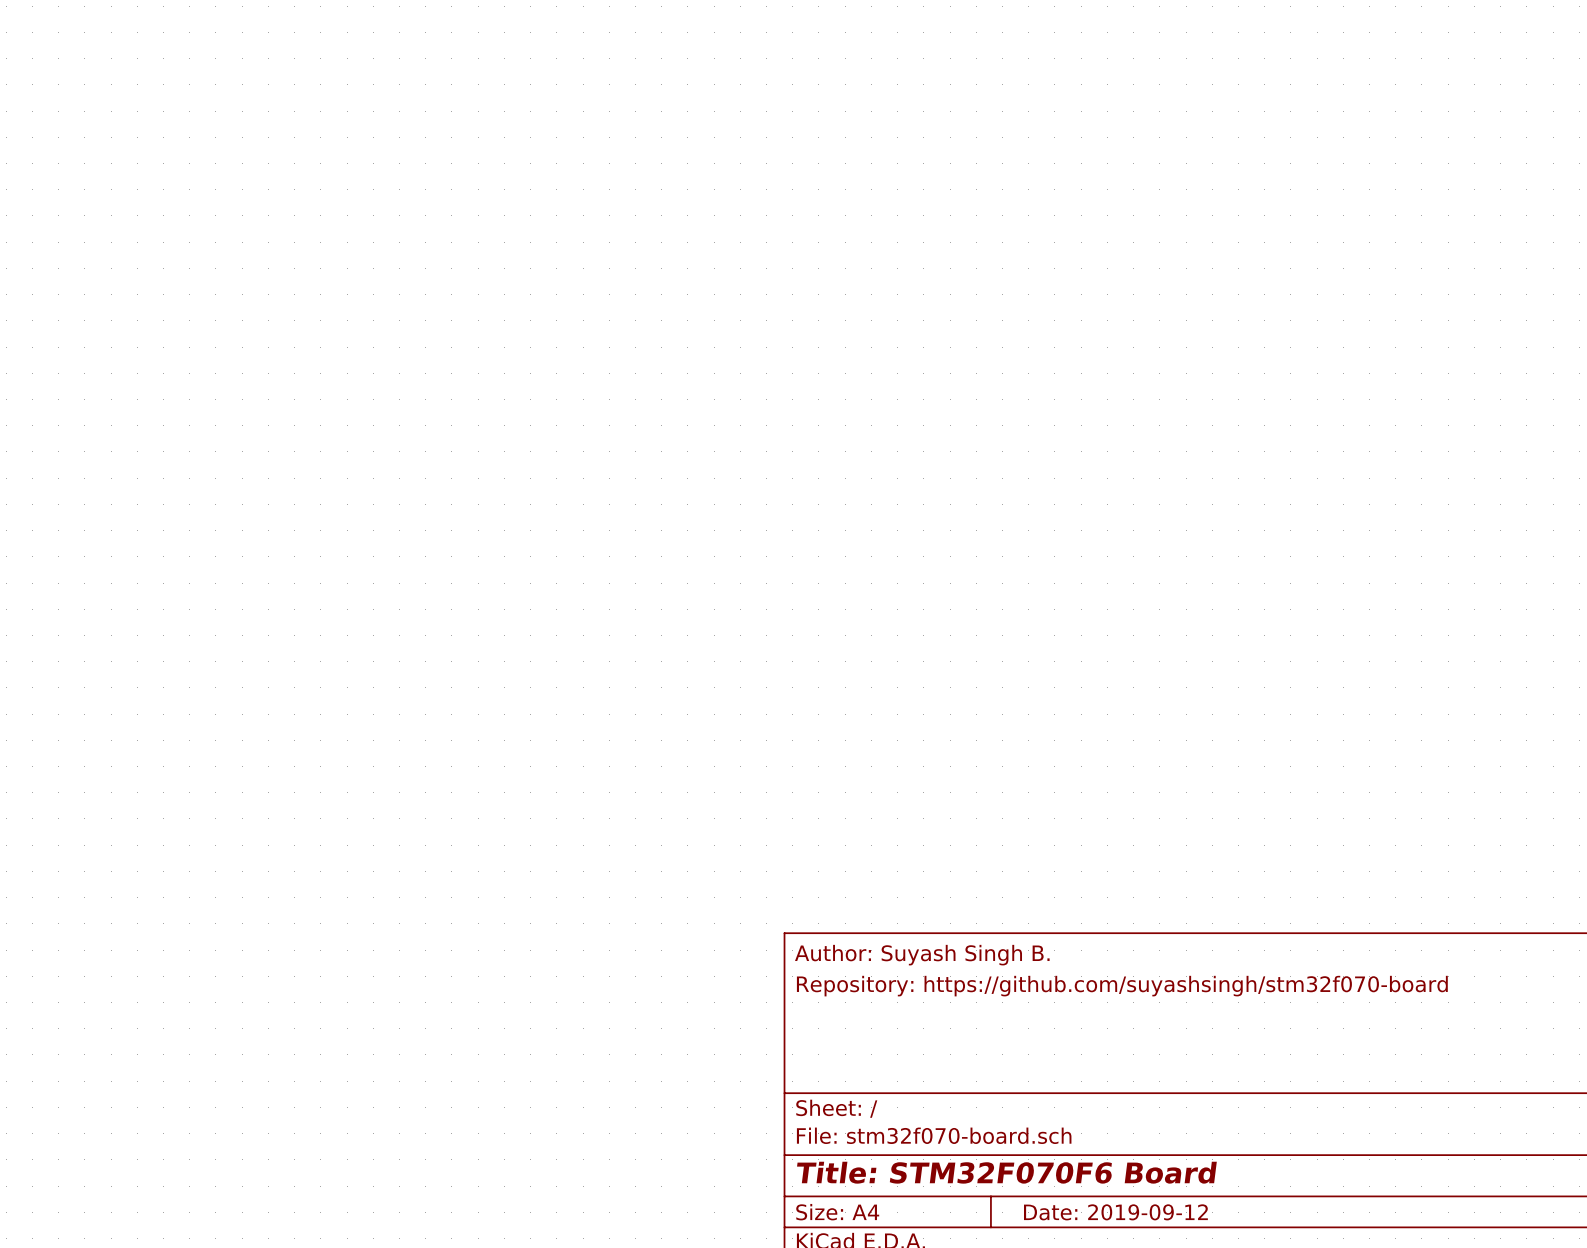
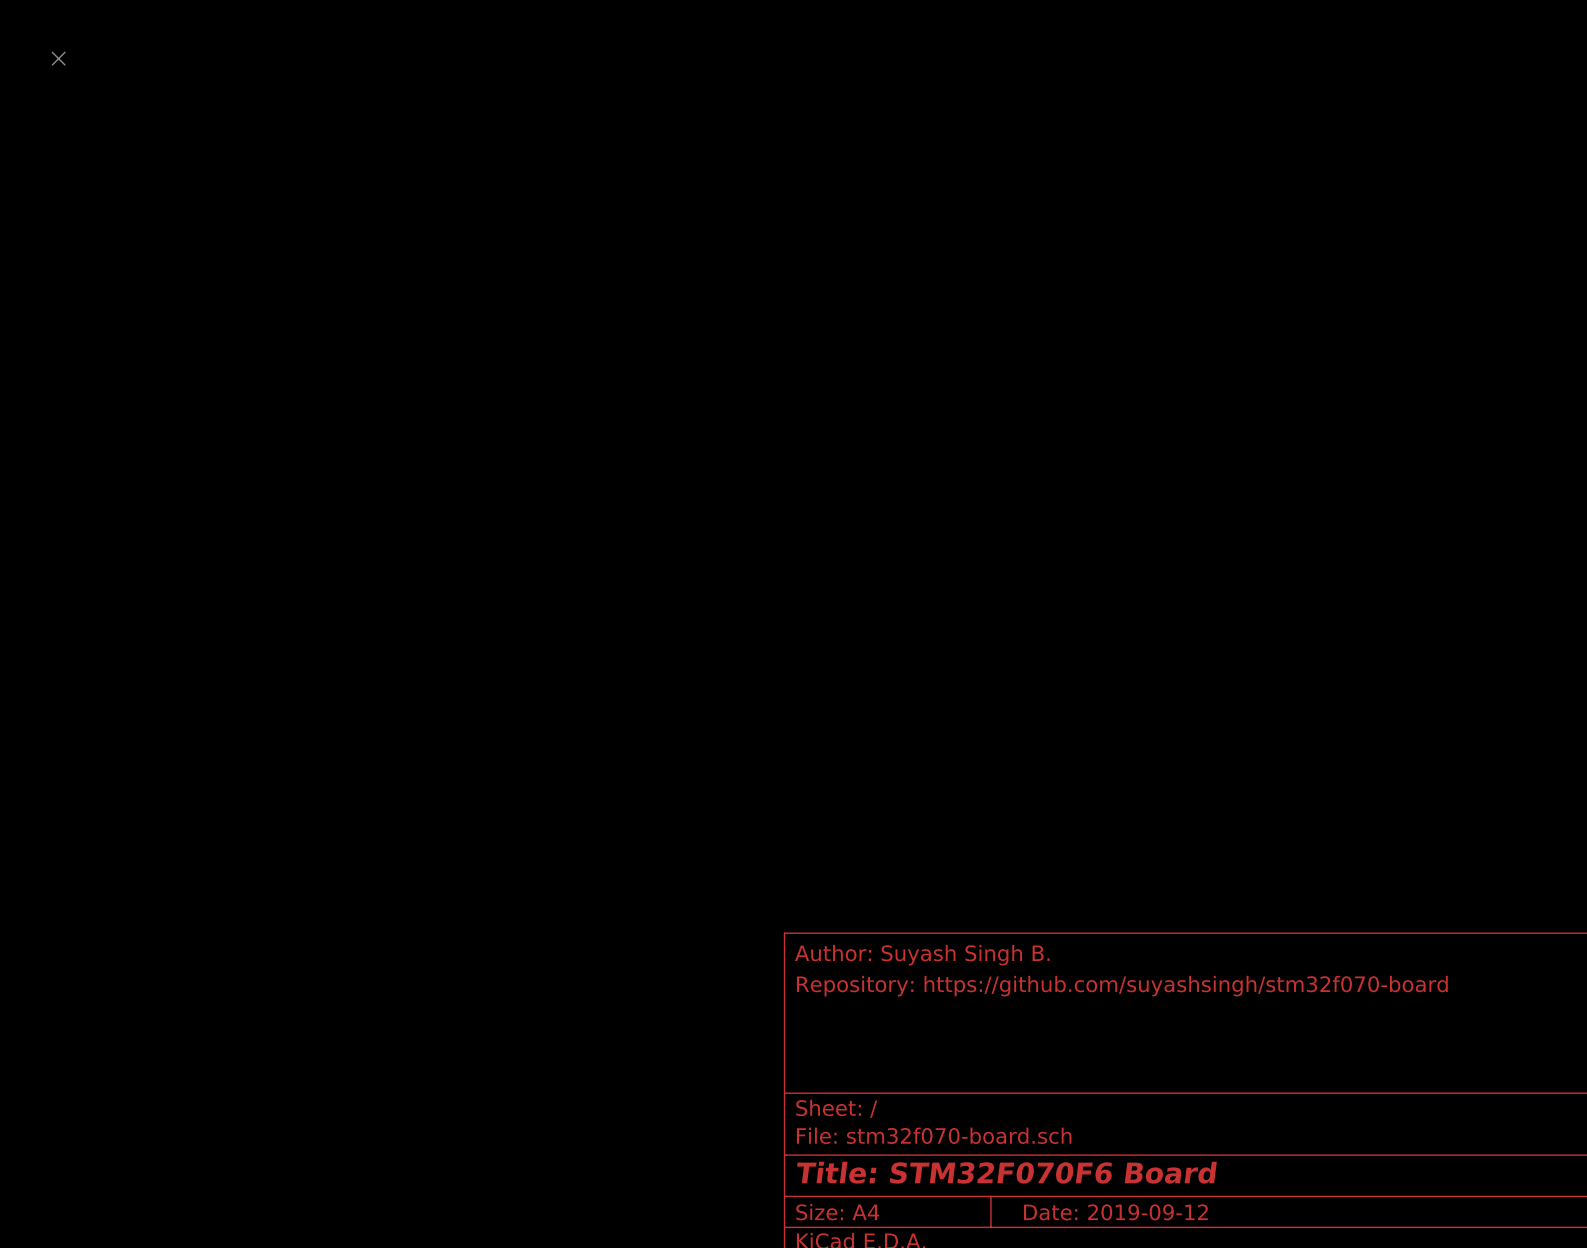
no-connect mark: none -> (58, 58)

